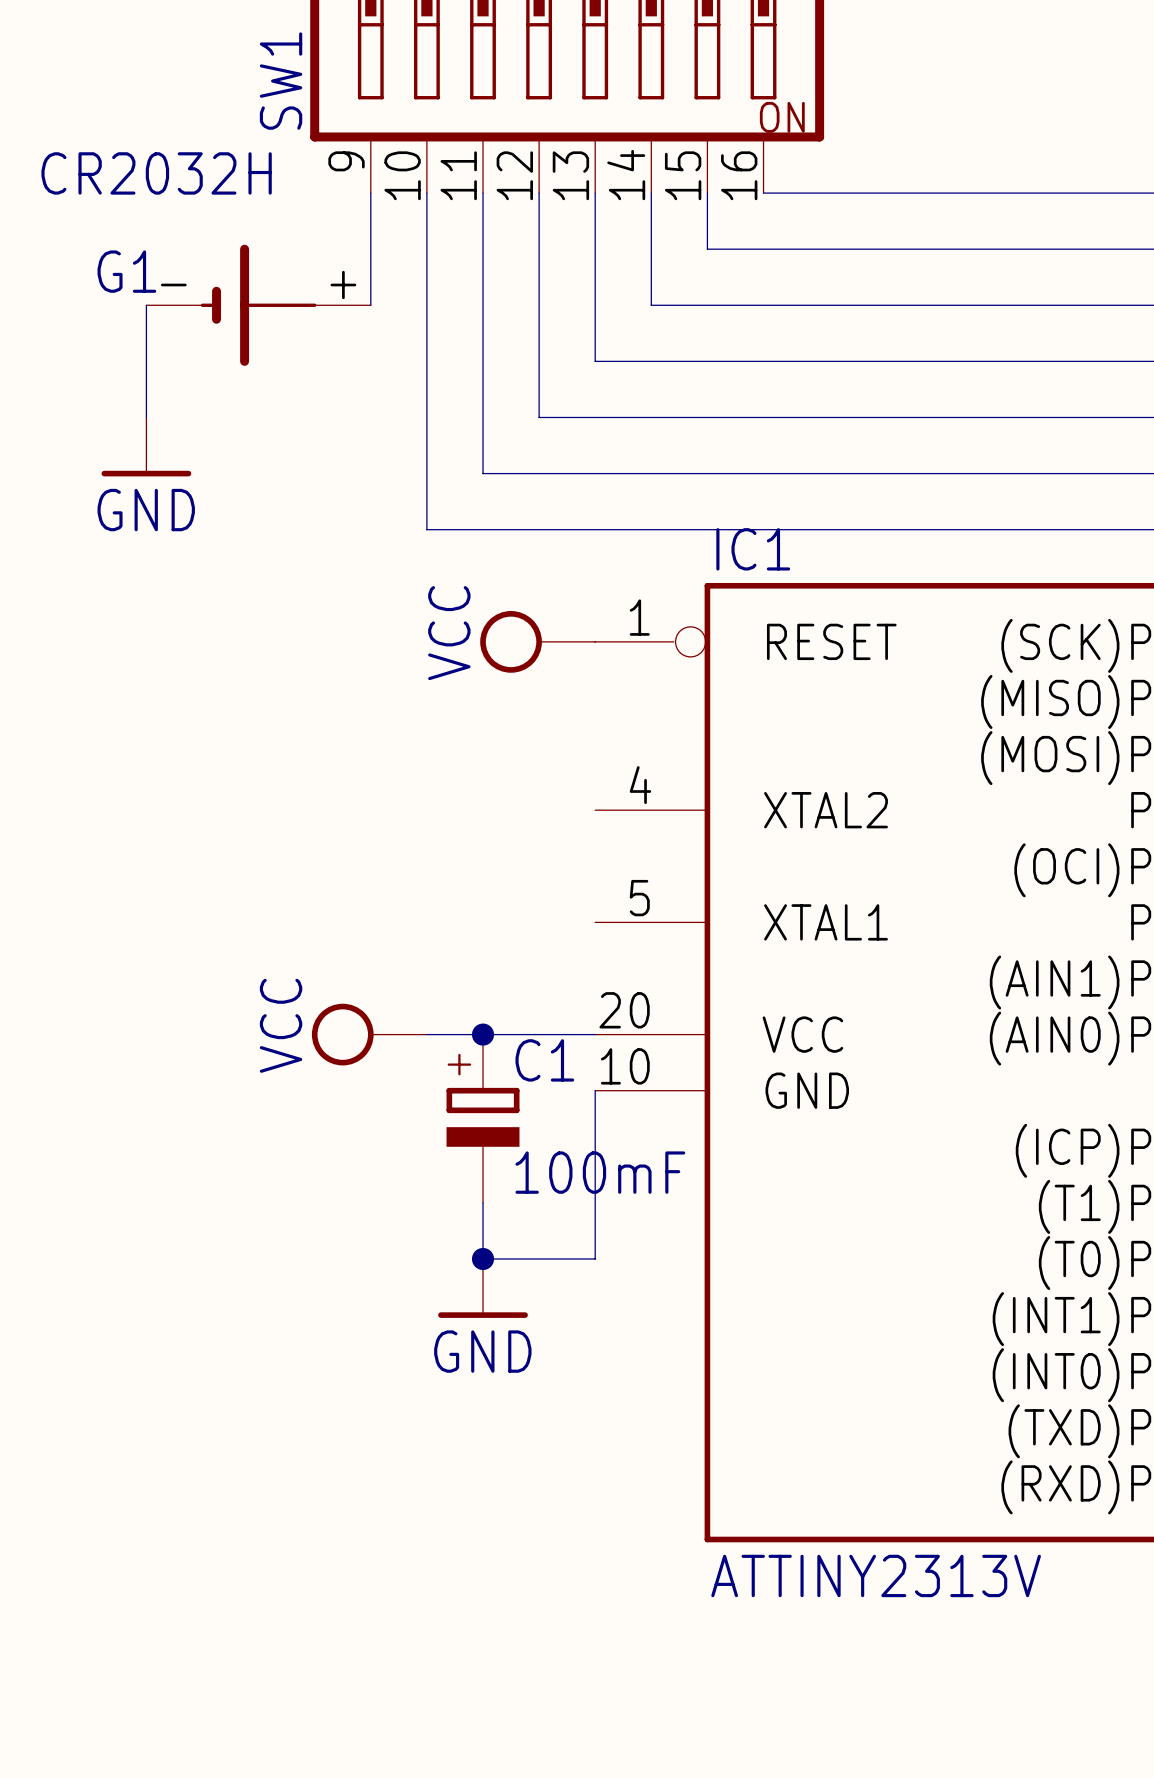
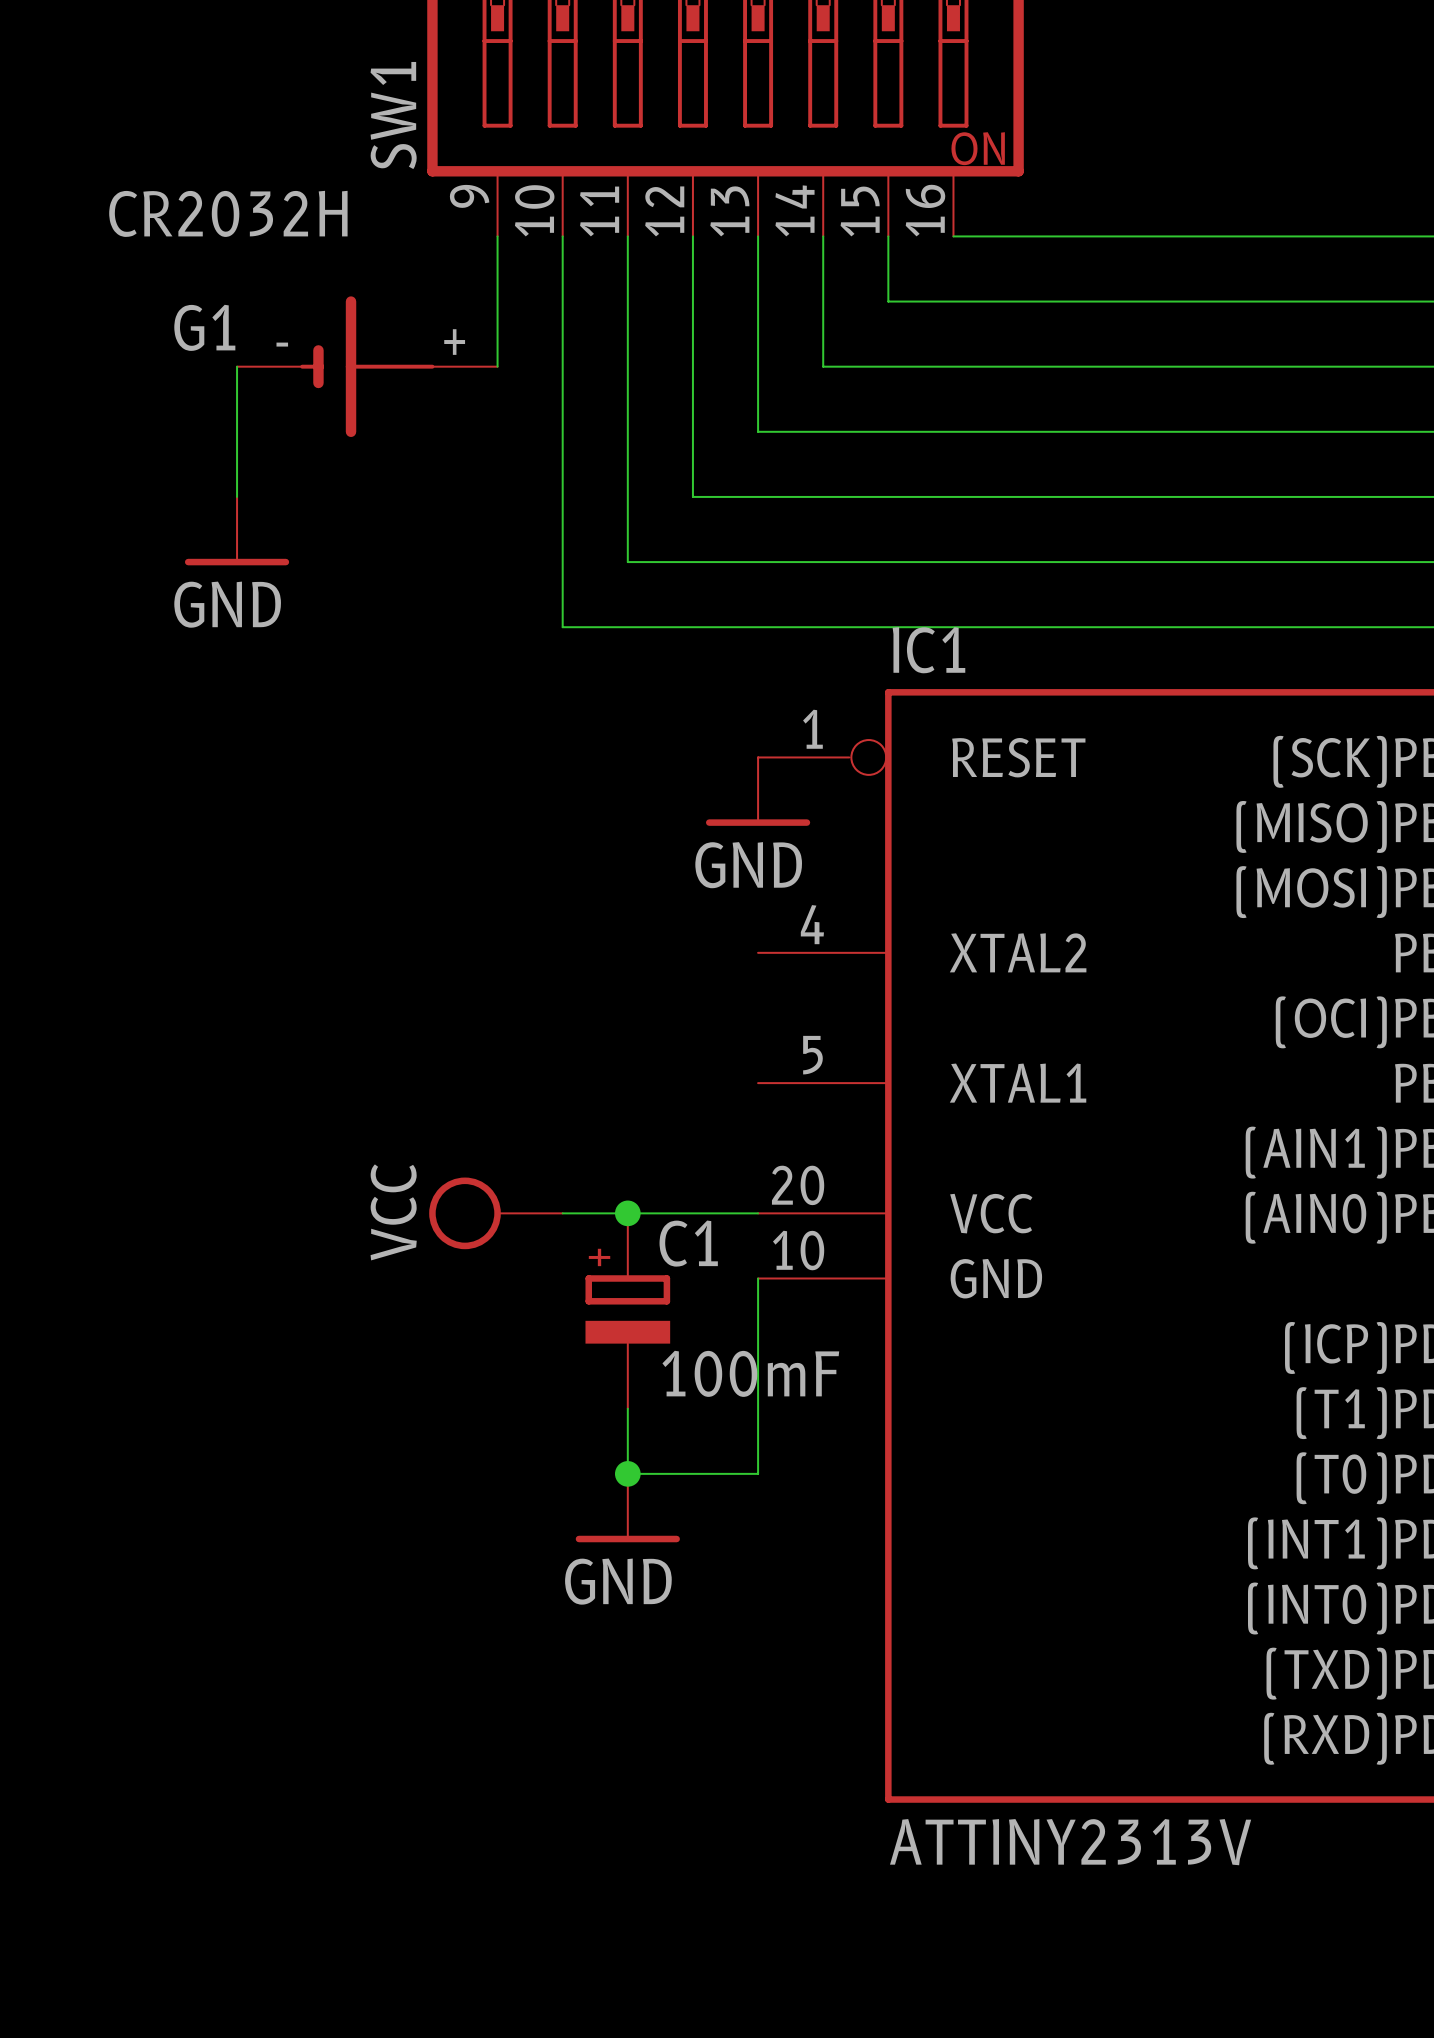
power symbol: VCC (537, 641) -> none
power symbol: none -> GND (758, 791)

